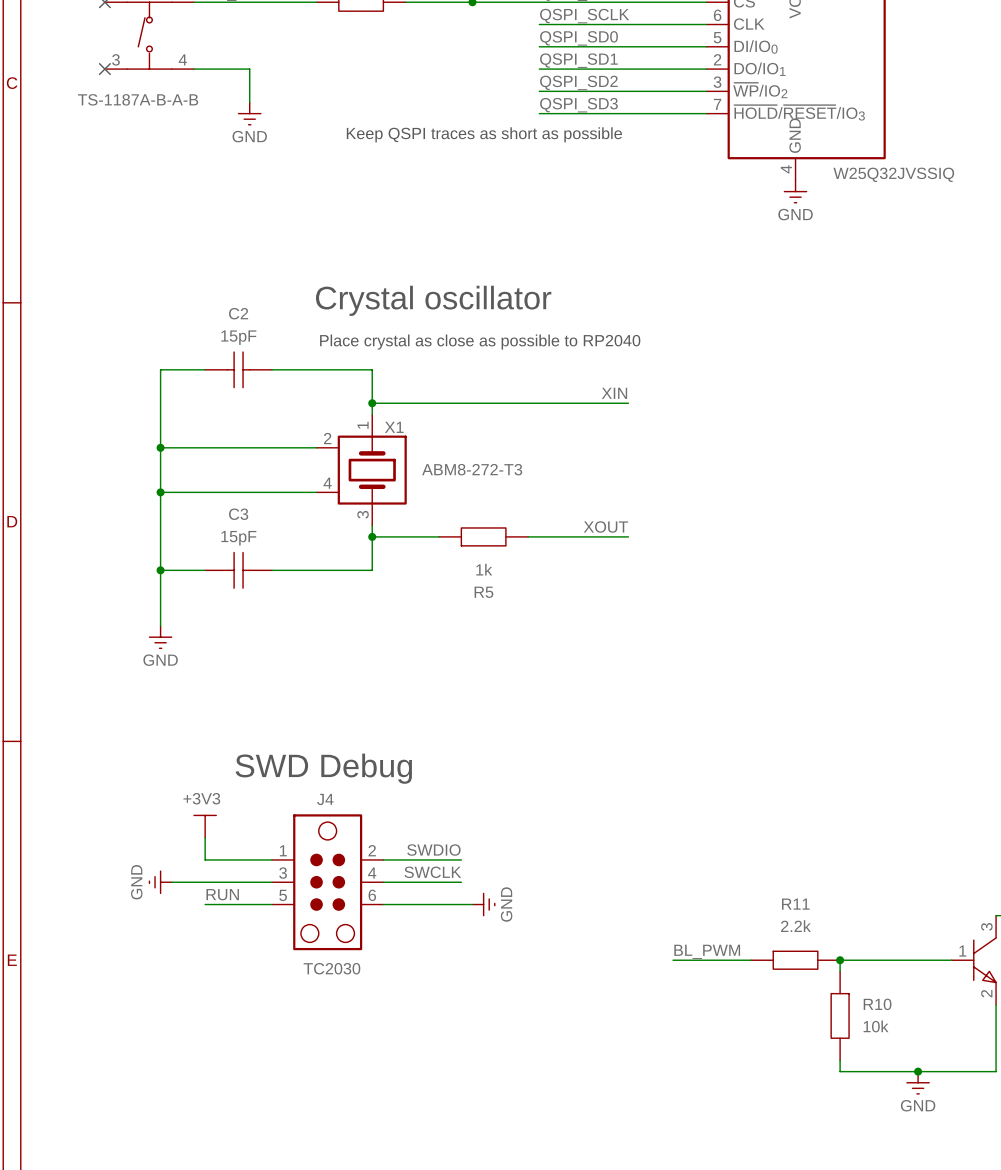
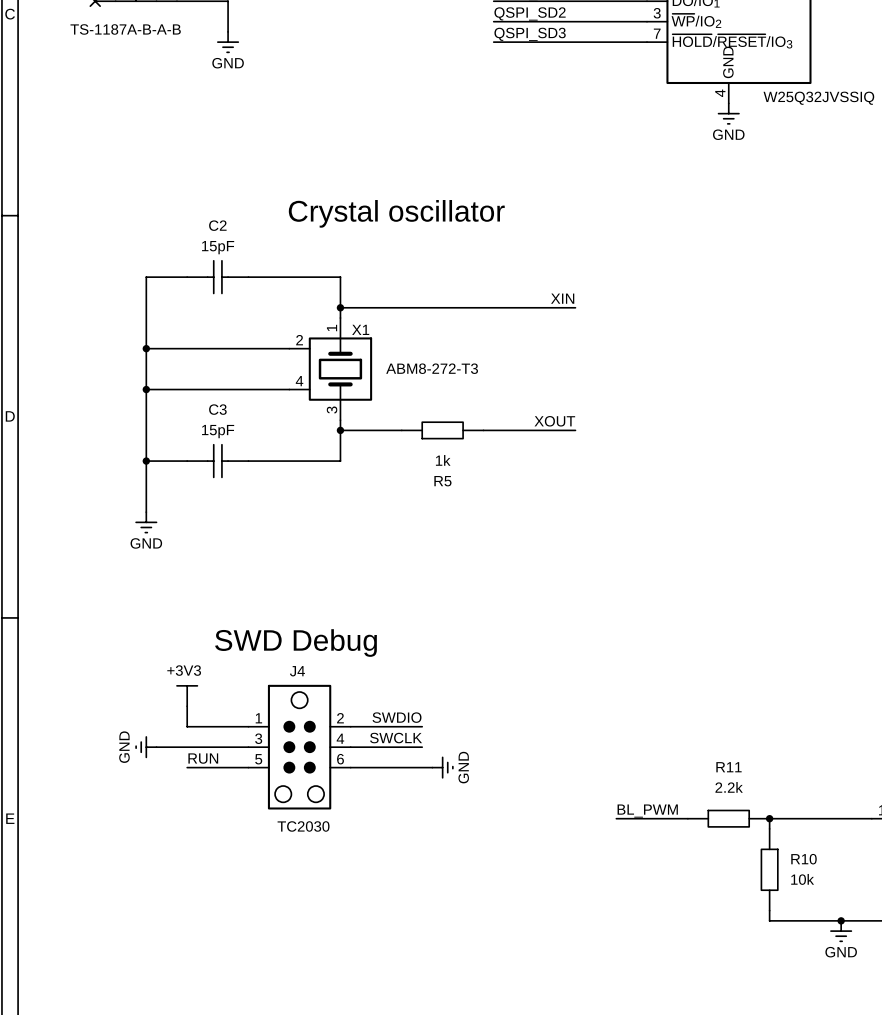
text: Keep QSPI traces as short as possible (484, 134) -> none
text: Place crystal as close as possible to RP2040 (480, 342) -> none

